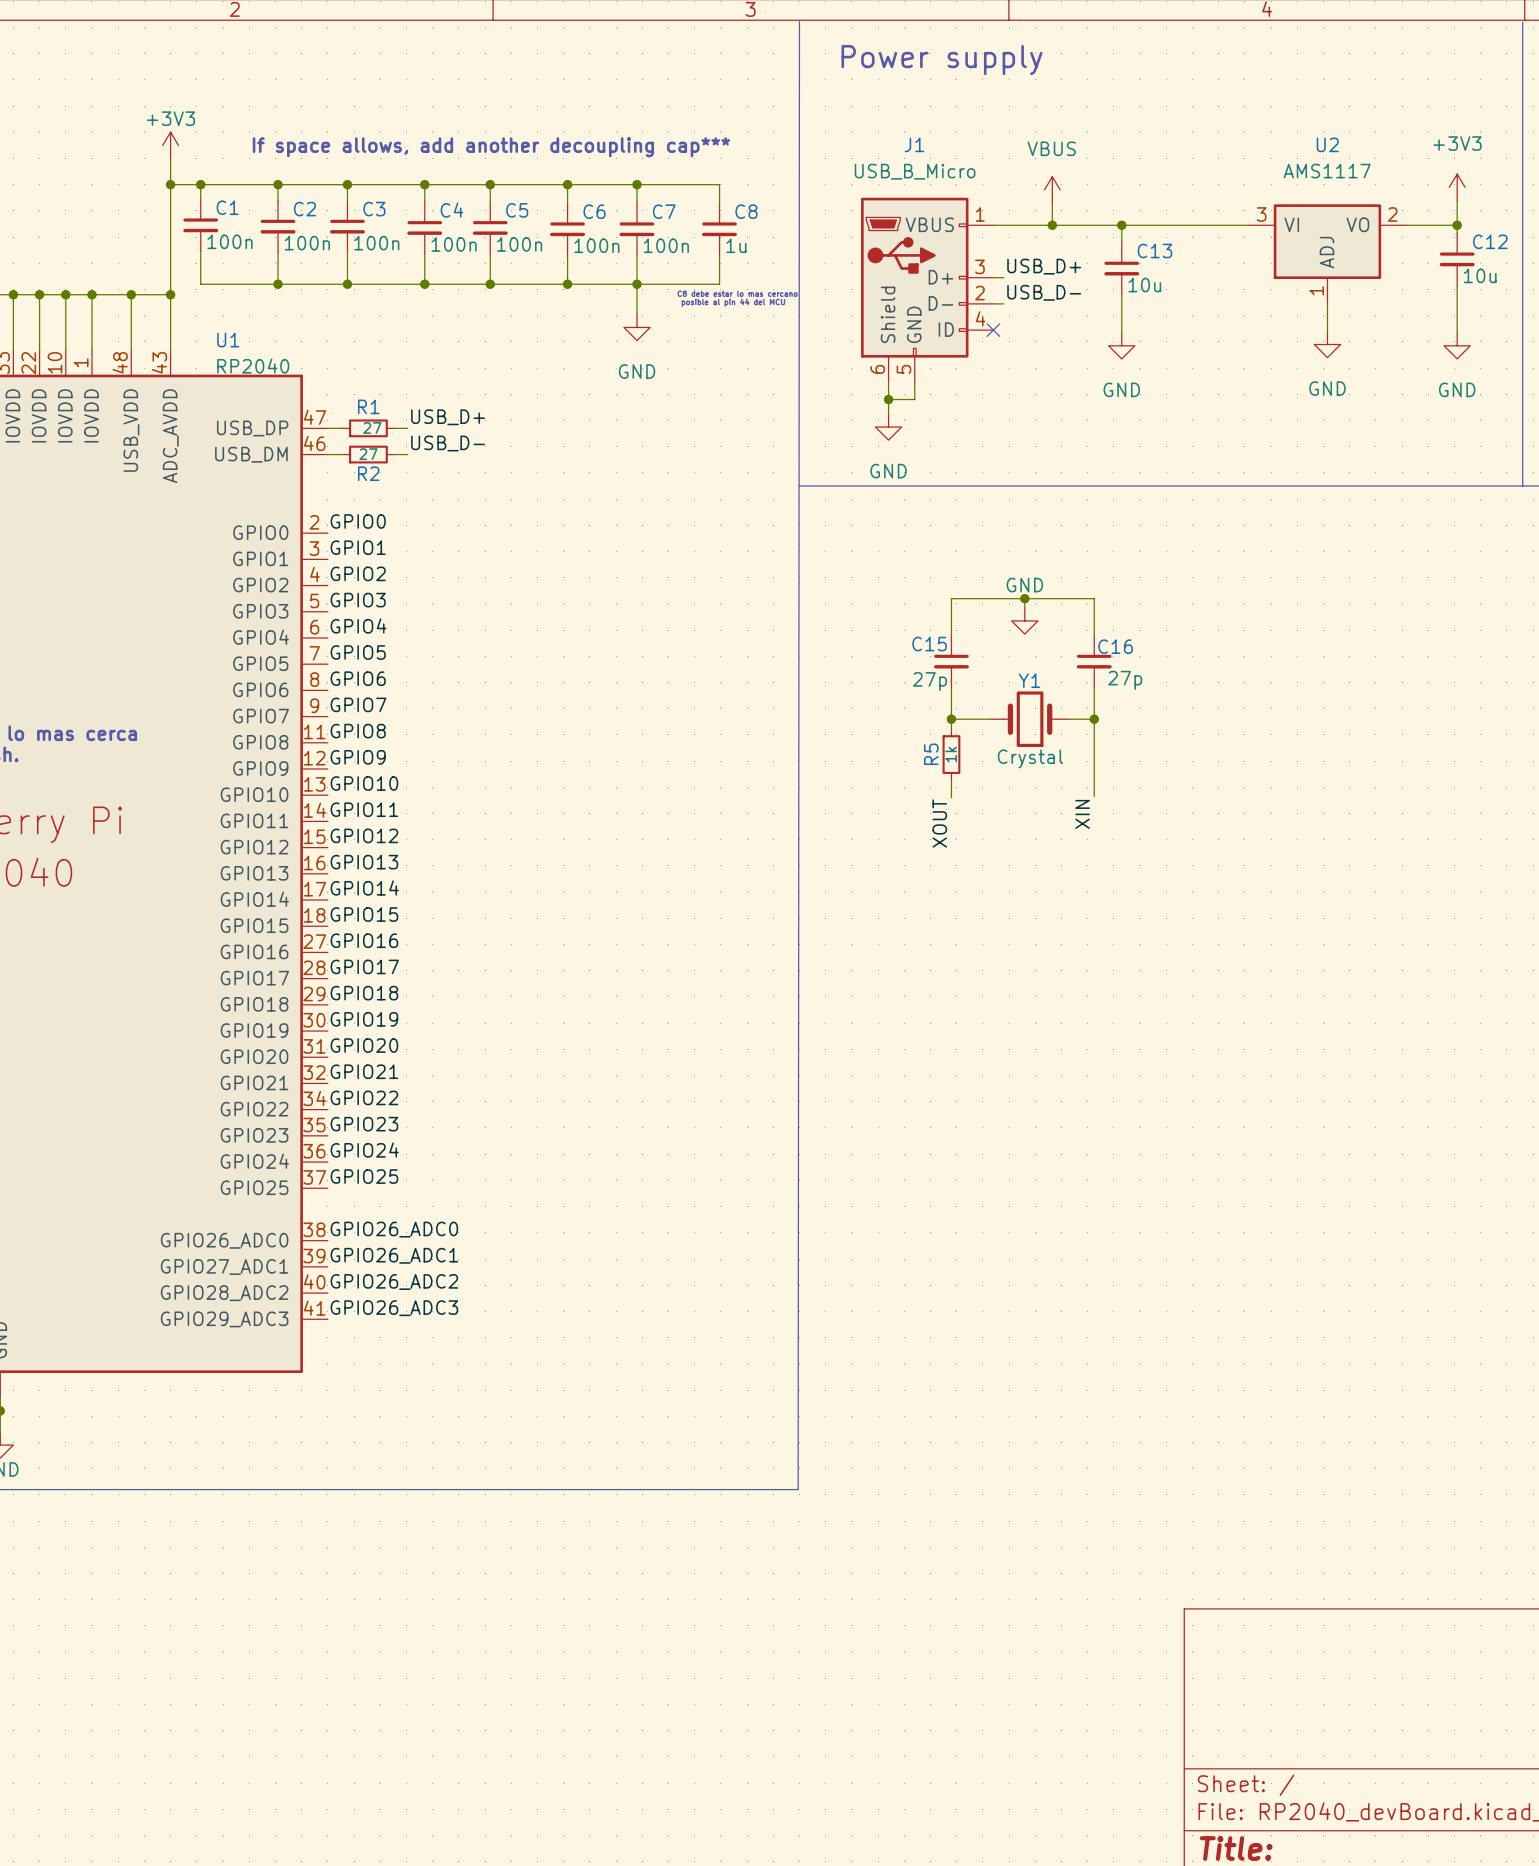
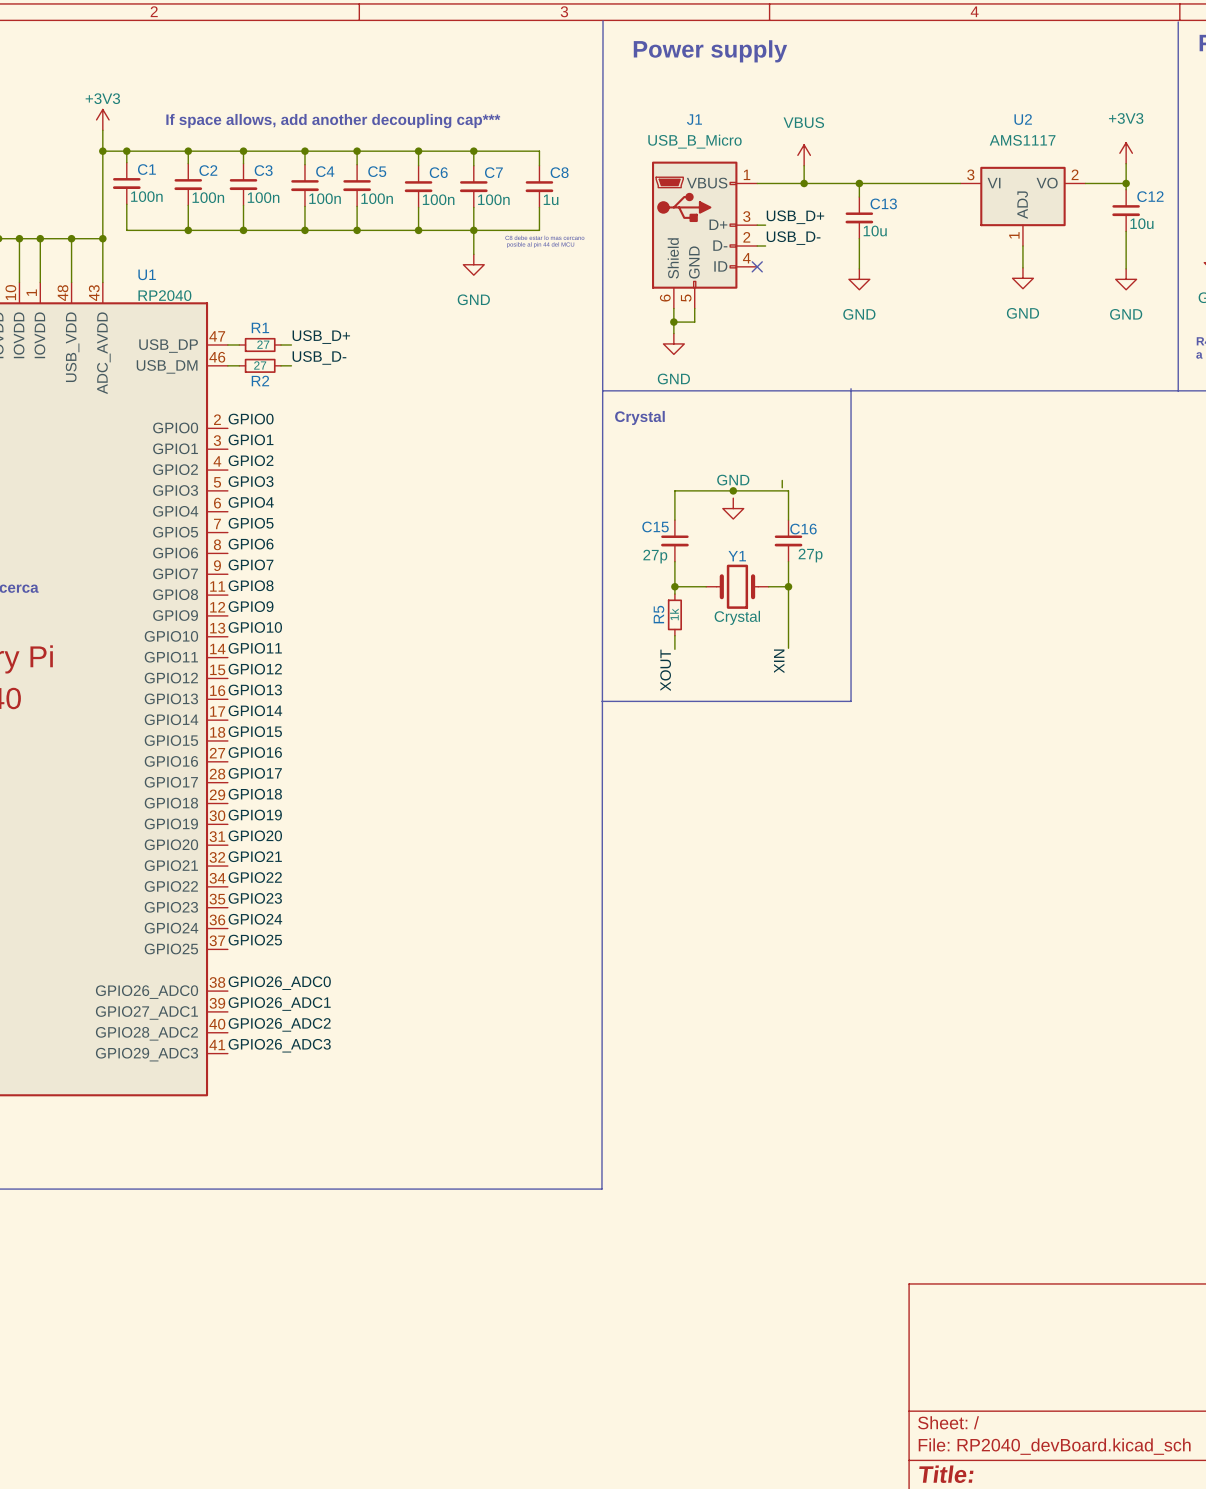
line: none -> (851, 388) (851, 701) (601, 701)
text: none -> Crystal (639, 417)
junction: (1024, 598) -> none
junction: none -> (733, 490)
power symbol position: GND (1024, 620) -> GND (733, 508)
wire: (951, 635) (951, 598) (1094, 598) (1094, 635) -> (674, 520) (674, 490) (788, 490) (788, 520)
C15 position: (951, 661) -> (674, 540)
C16 position: (1094, 661) -> (788, 540)
wire: (951, 687) (951, 728) -> (674, 561) (674, 594)
wire: (1094, 687) (1094, 796) -> (788, 561) (788, 648)
wire: (951, 719) (990, 719) -> (674, 586) (706, 586)
junction: (951, 719) -> none
Y1 position: (1030, 719) -> (737, 586)
wire: (1069, 719) (1094, 719) -> (768, 586) (788, 586)
junction: (1094, 719) -> none
junction: none -> (674, 586)
junction: none -> (788, 586)
R5 position: (951, 754) -> (674, 614)
wire: (951, 780) (951, 797) -> (674, 635) (674, 649)
label position: XIN (1082, 814) -> XIN (779, 661)
label position: XOUT (939, 823) -> XOUT (665, 670)

